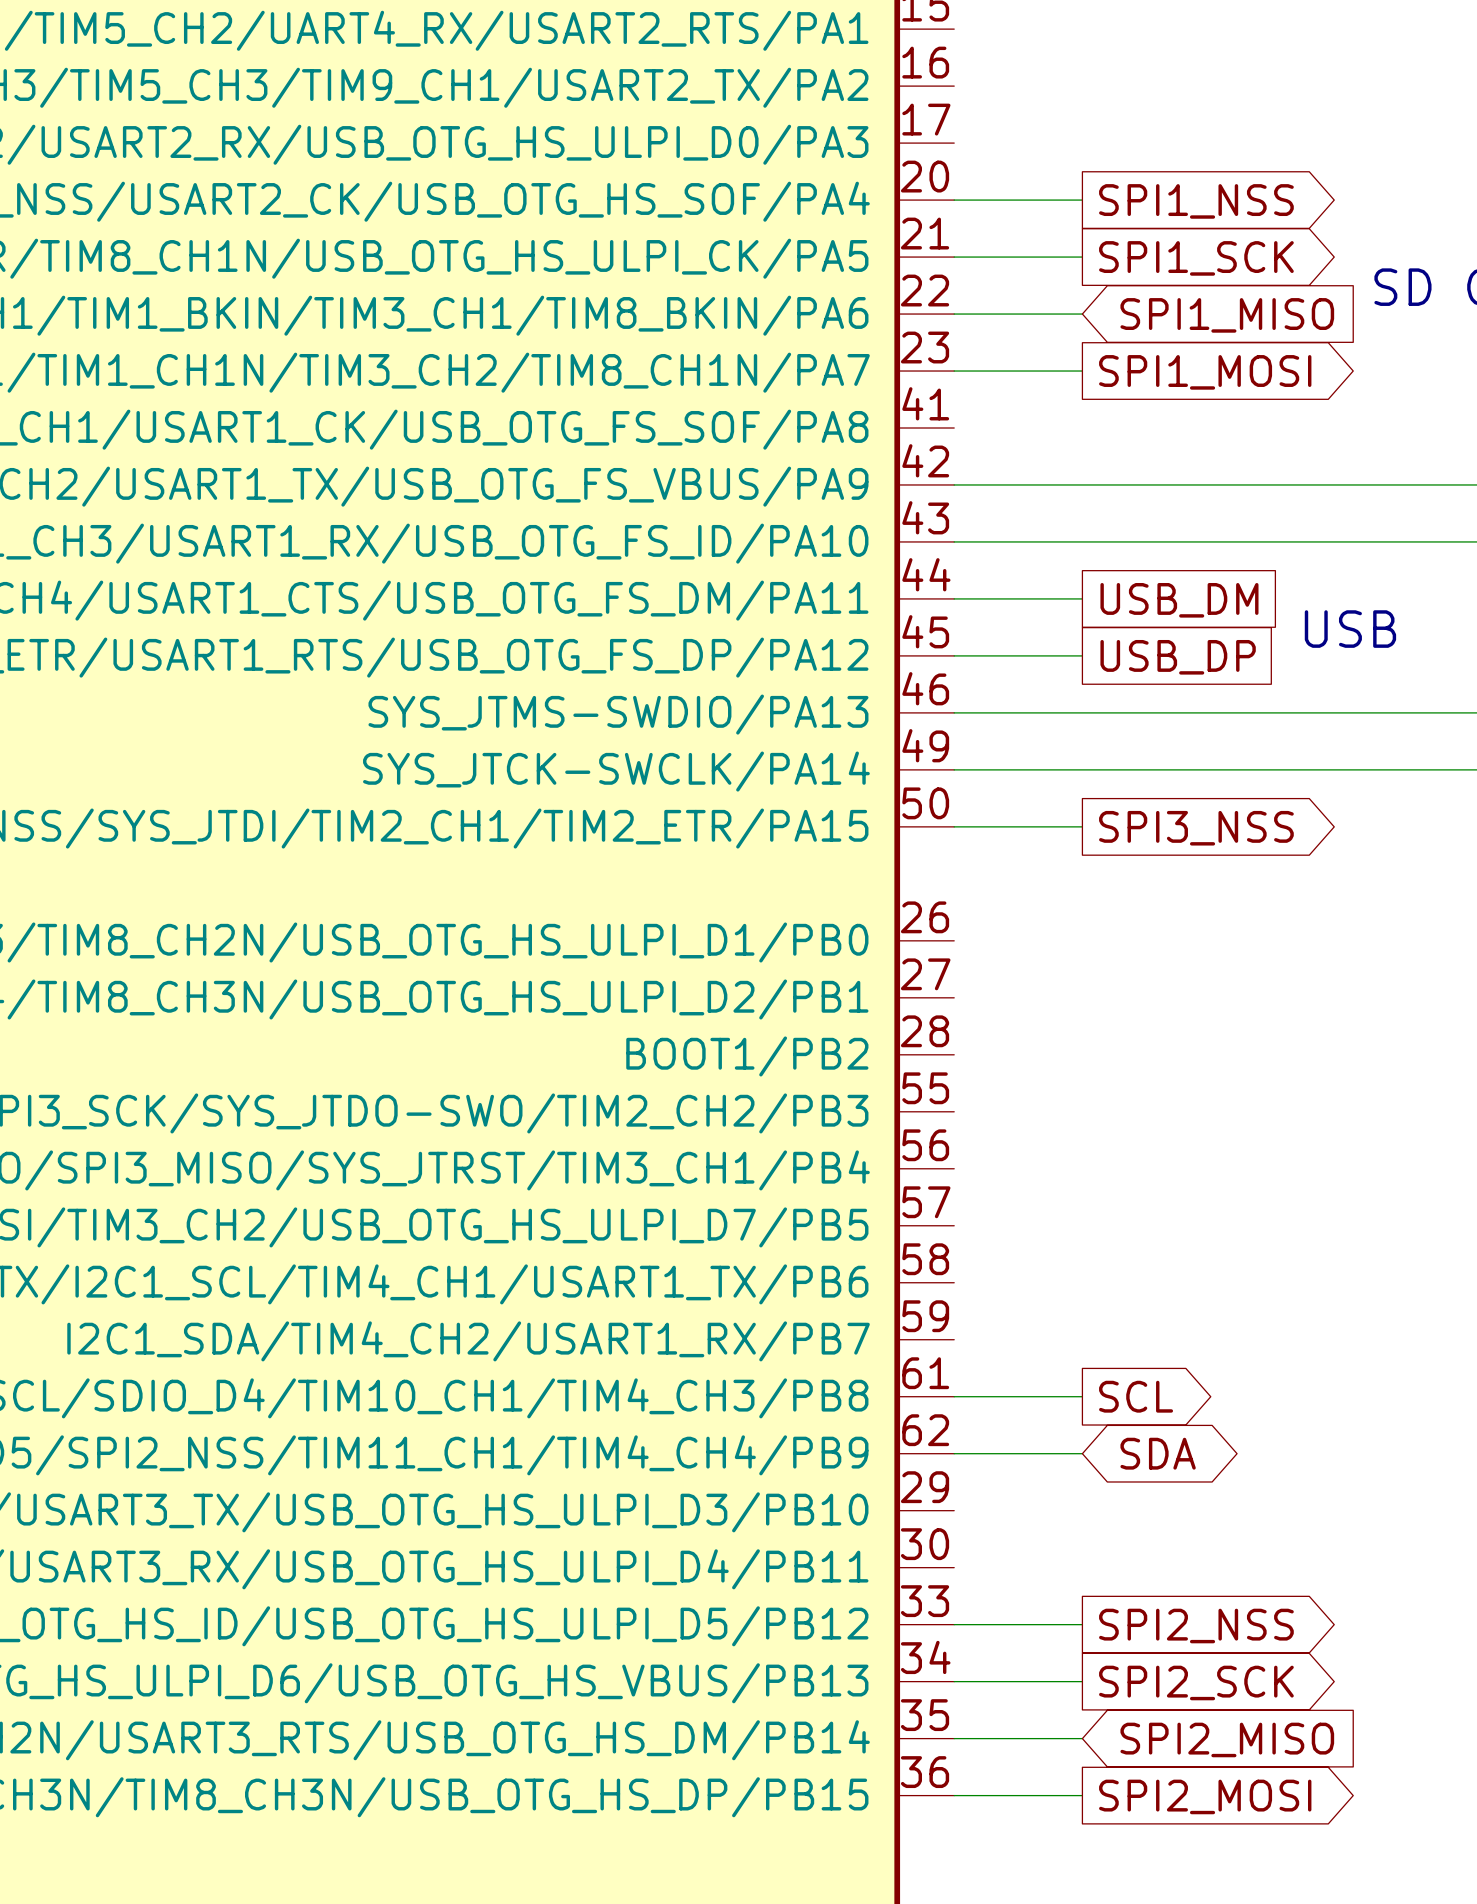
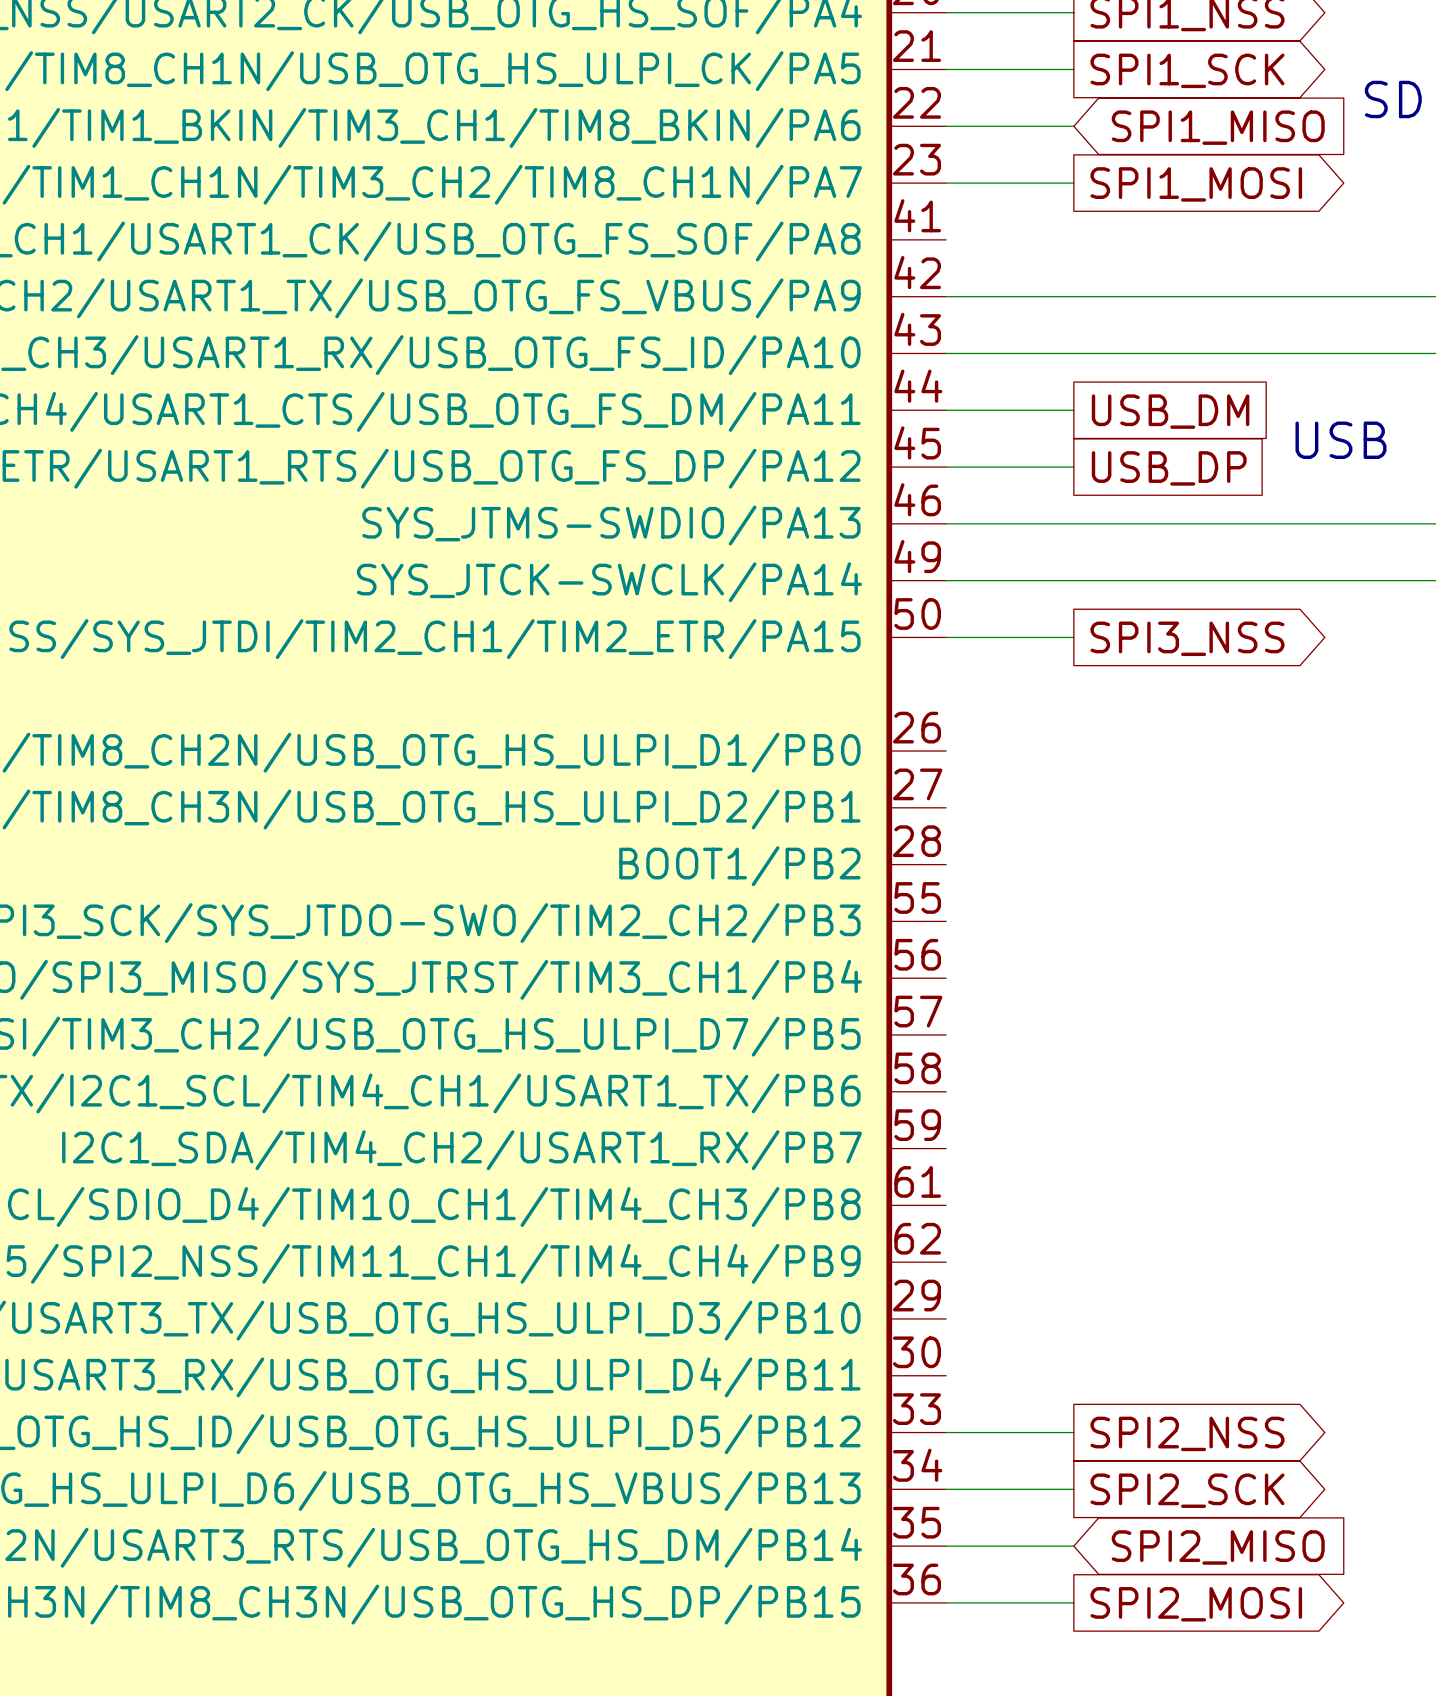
wire: (954, 1396) (1082, 1396) -> none
global label: SCL (1136, 1396) -> none
wire: (954, 1453) (1082, 1453) -> none
global label: SDA (1158, 1453) -> none

